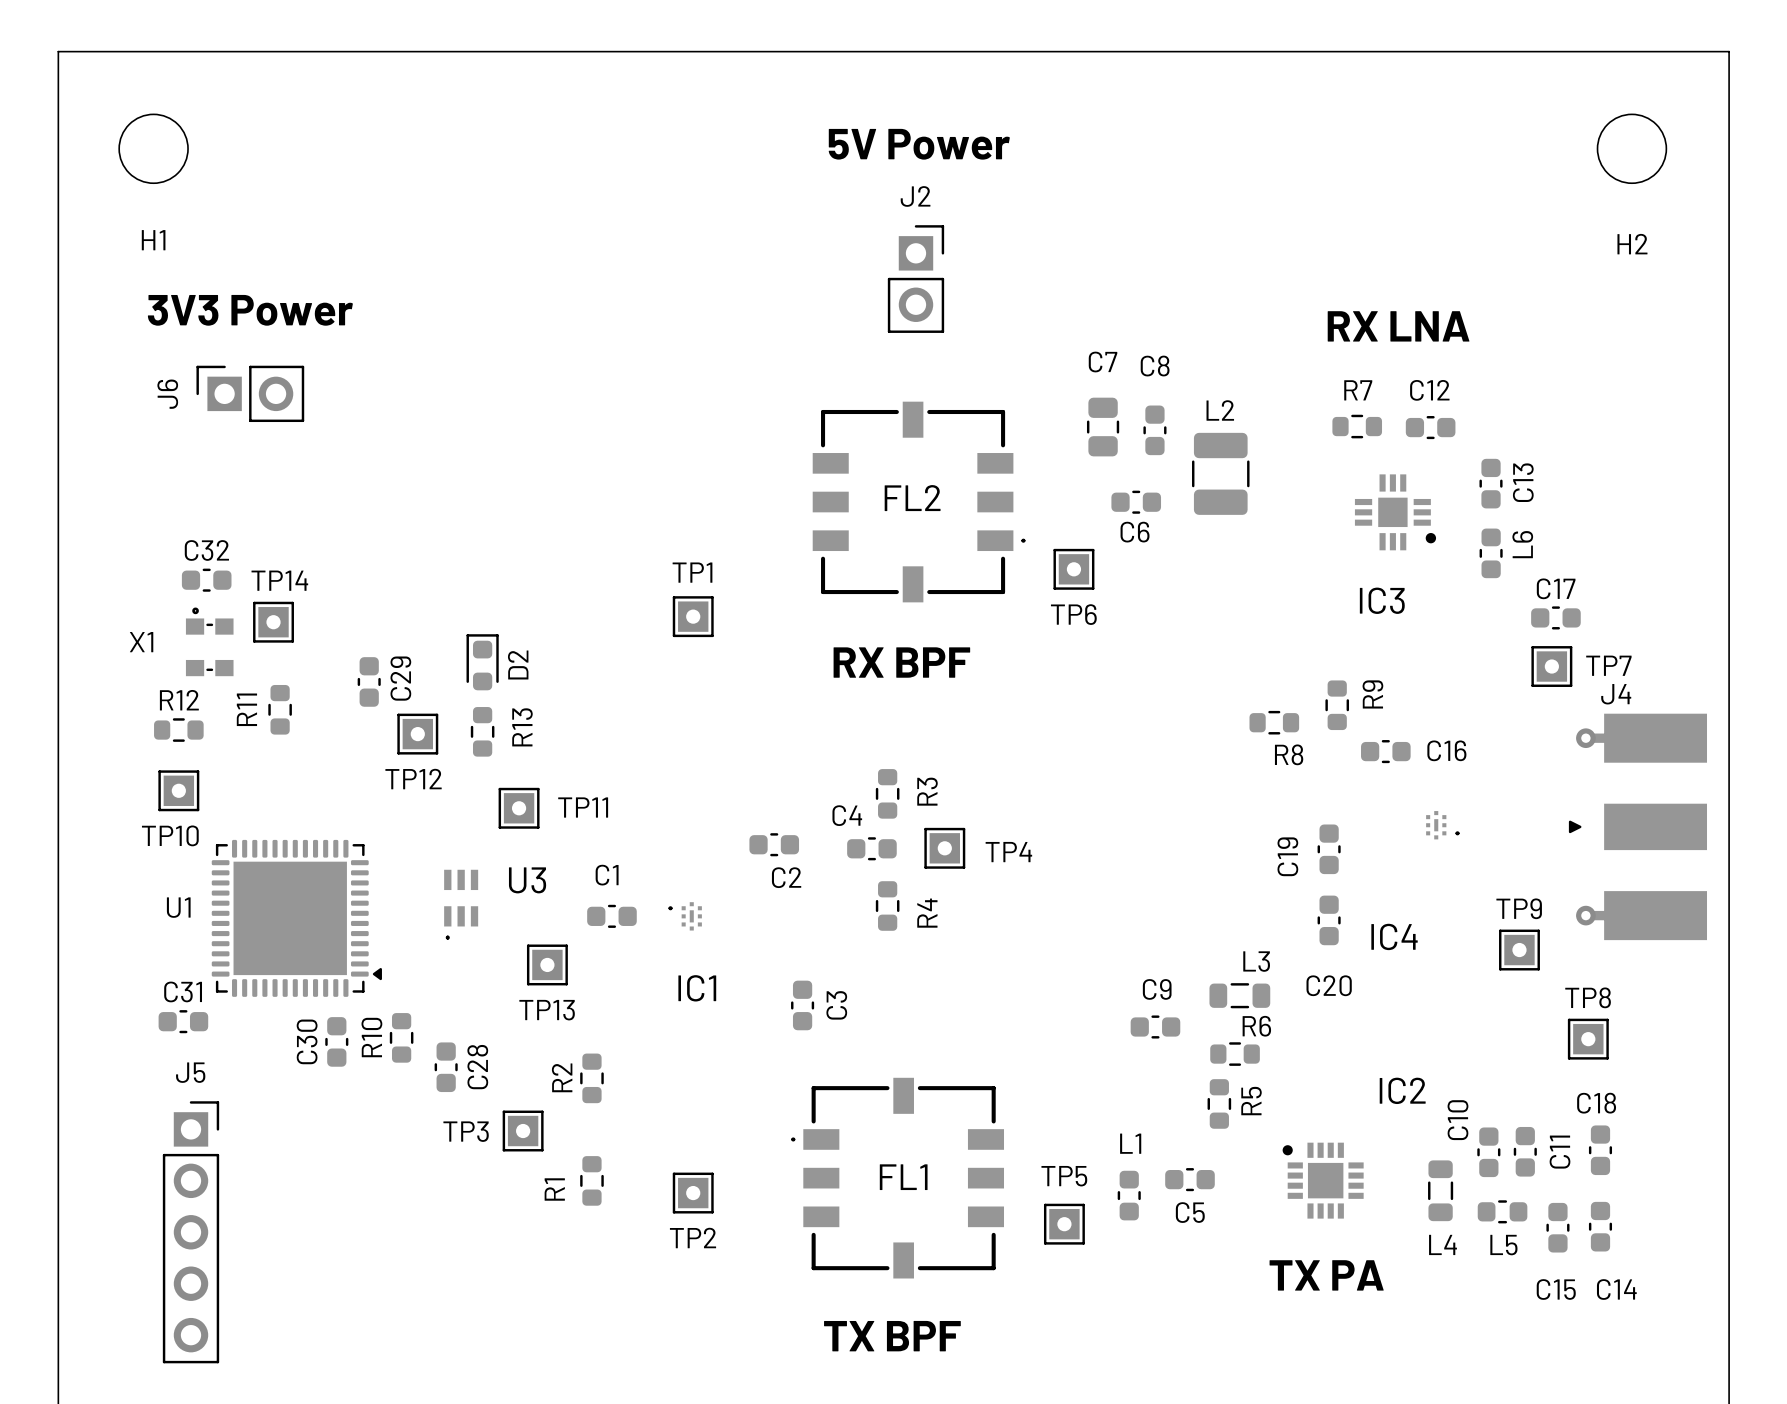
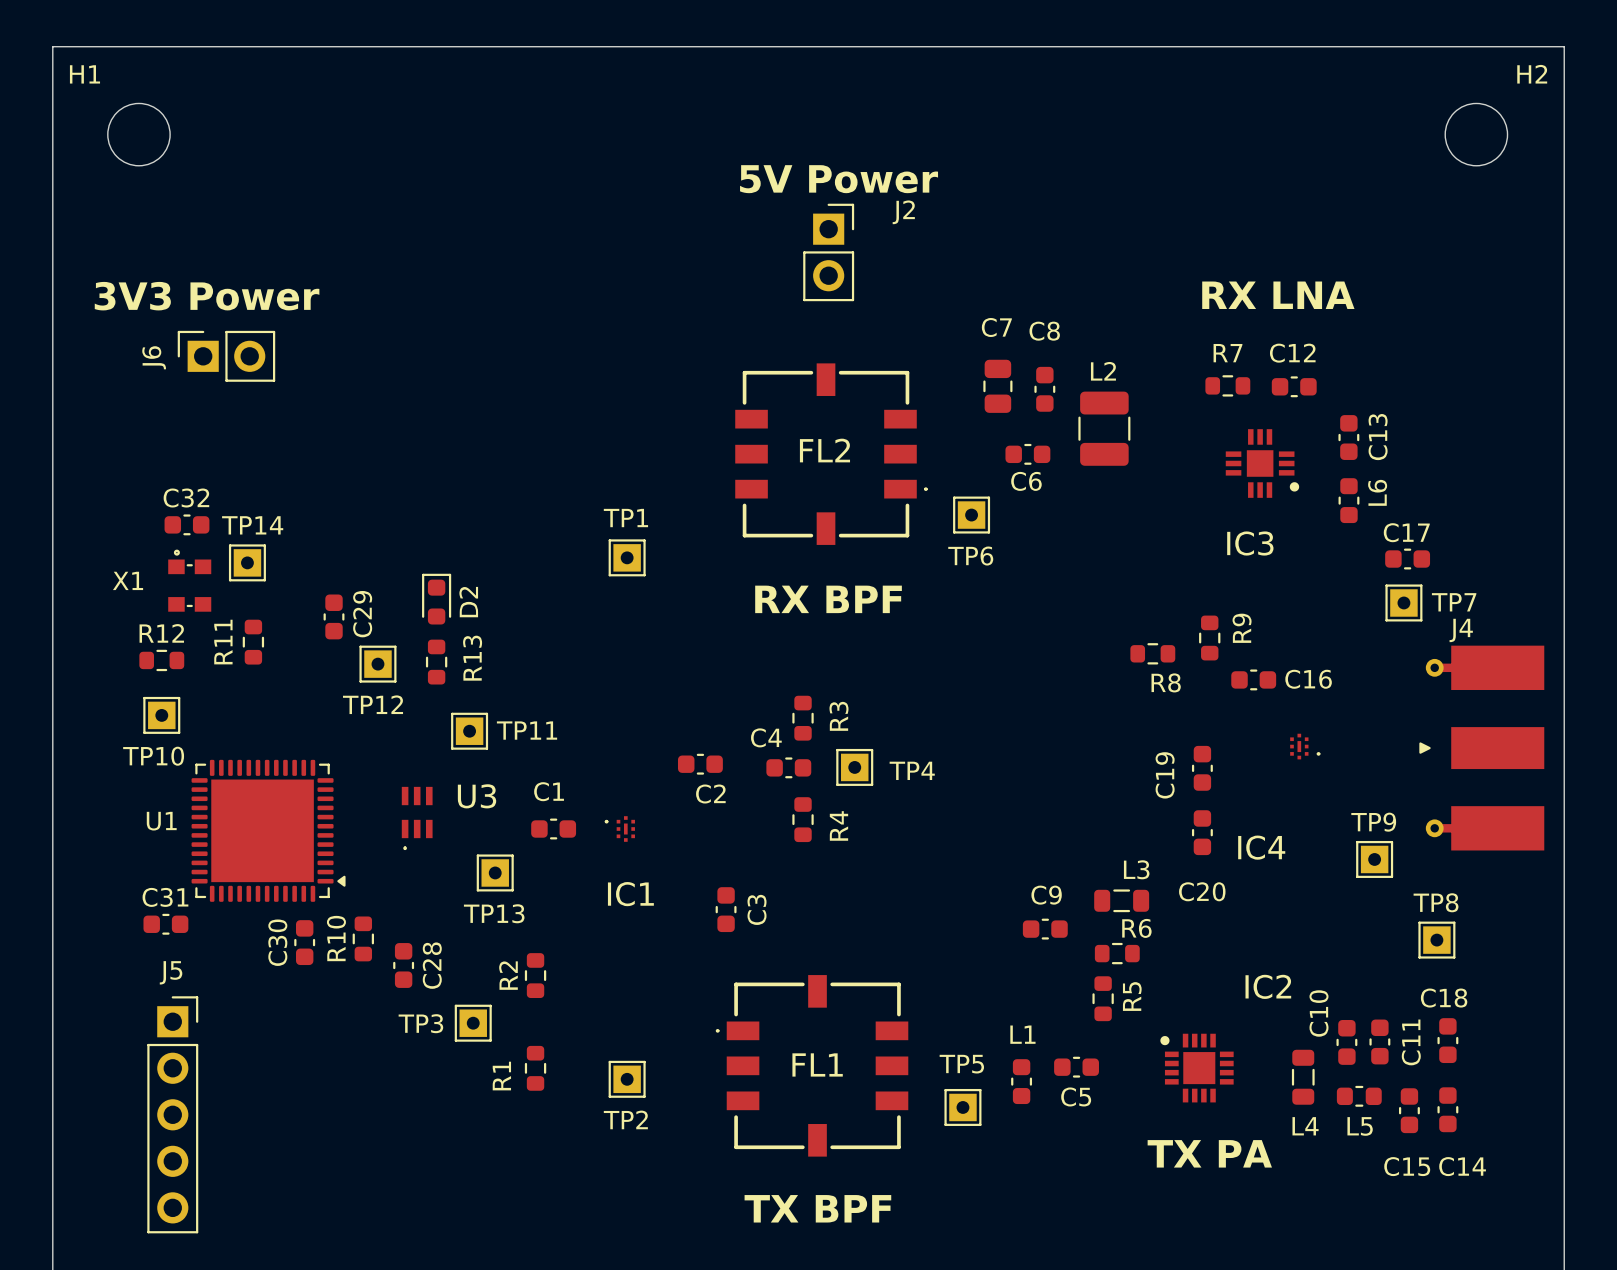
text position: 5V Power (919, 144) -> 5V Power (839, 179)
J2 name position: J2 (915, 196) -> J2 (903, 212)
H1 name position: H1 (153, 240) -> H1 (84, 74)
H2 name position: H2 (1632, 244) -> H2 (1532, 74)
text position: 3V3 Power (250, 310) -> 3V3 Power (207, 296)

